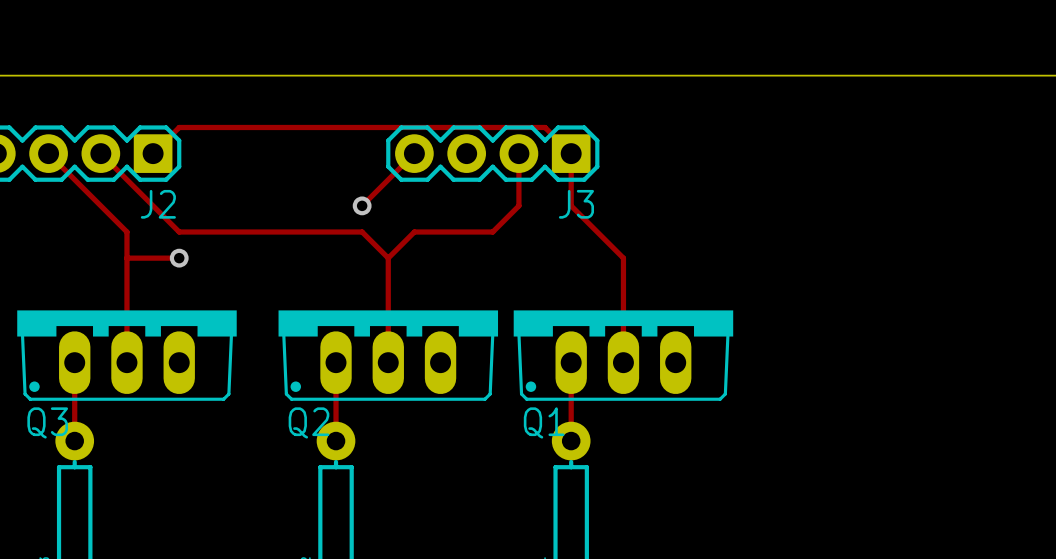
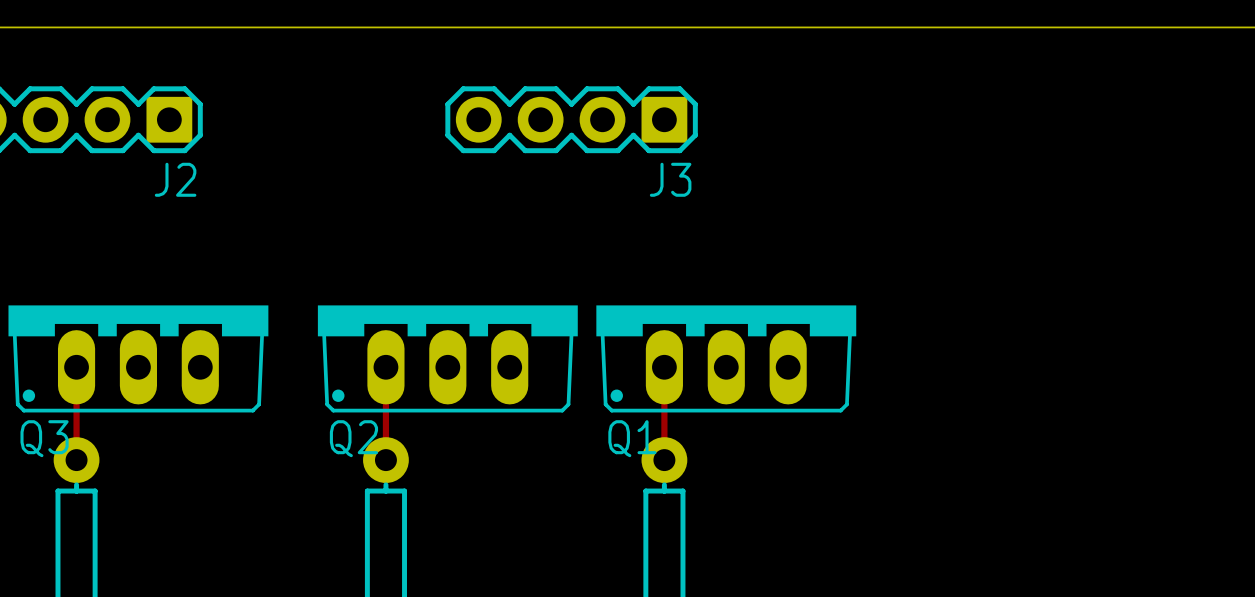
track: (48, 153) (126, 232) (126, 362) -> none
track: (100, 153) (179, 232) (362, 232) (388, 258) -> none
track: (153, 153) (179, 127) (545, 127) (571, 153) (571, 205) (623, 258) (623, 362) -> none
track: (414, 153) (362, 205) -> none
track: (518, 153) (518, 205) (492, 232) (414, 232) (388, 258) -> none
via: (362, 205) -> none
track: (126, 258) (179, 258) -> none
via: (179, 258) -> none
track: (388, 258) (388, 362) -> none

